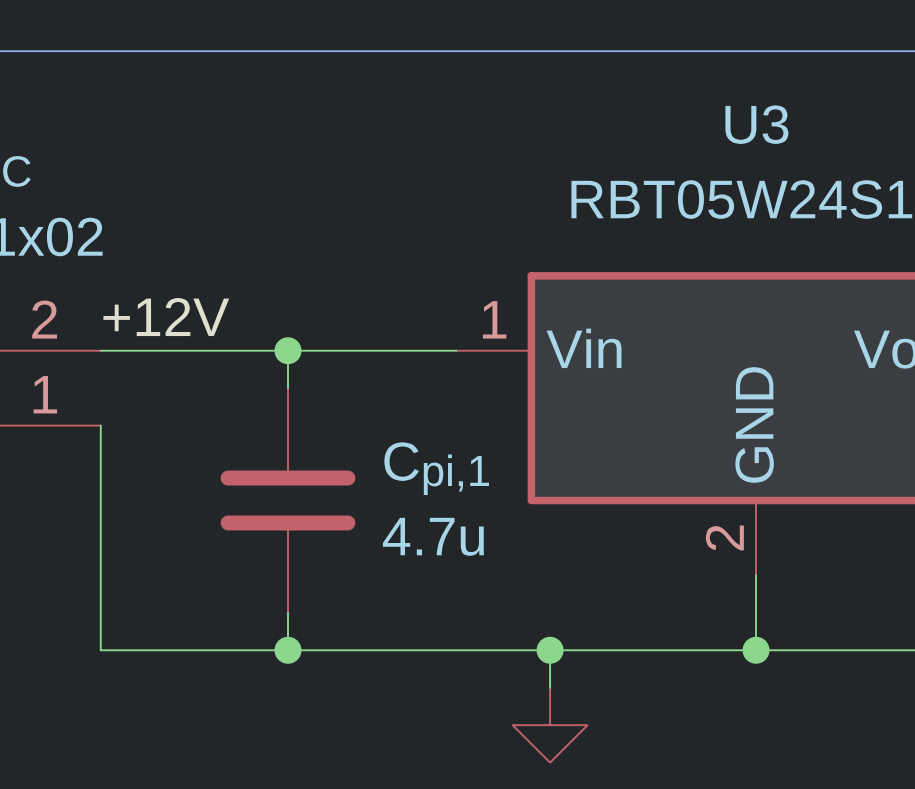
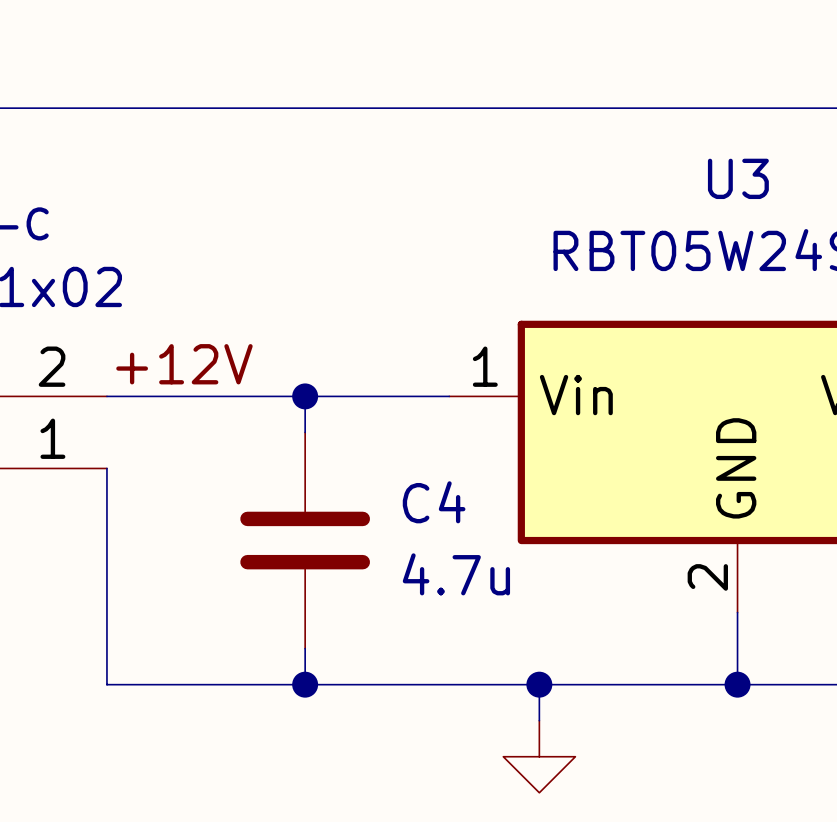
wire: (287, 350) (287, 388) -> (305, 396) (305, 432)
junction position: (287, 350) -> (305, 396)
Cpi,1 name: Cpi,1 (436, 468) -> C4 (434, 502)
Cpi,1 position: (287, 500) -> (305, 540)
wire: (287, 612) (287, 650) -> (305, 648) (305, 684)
junction position: (287, 650) -> (305, 684)

